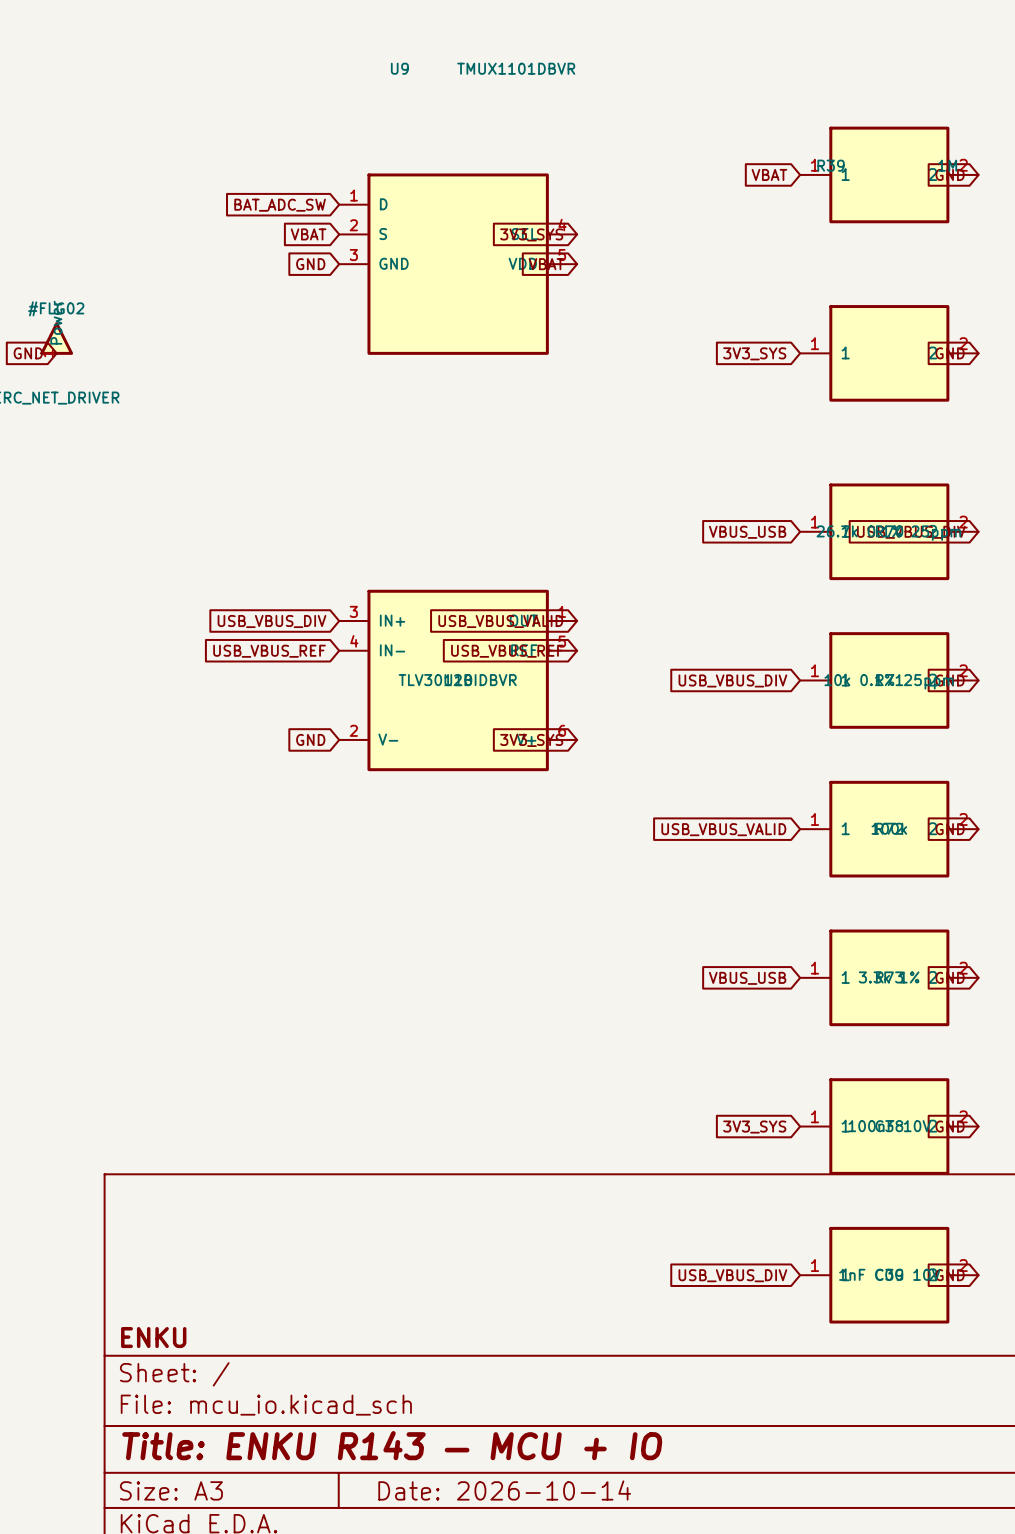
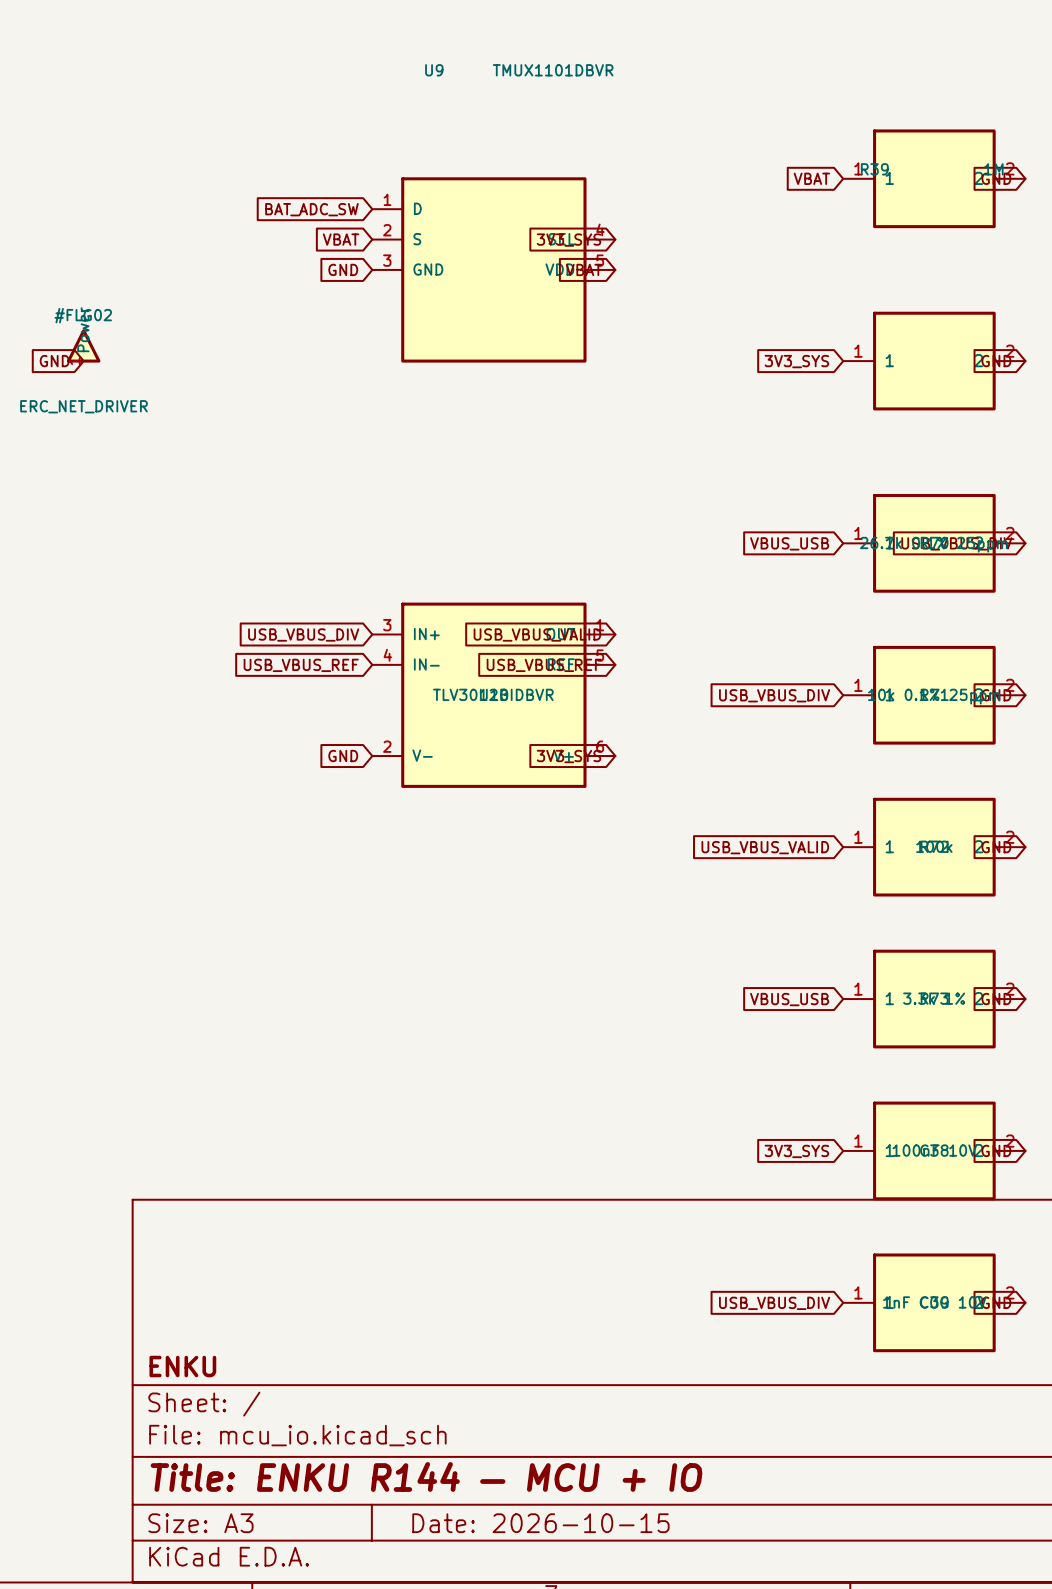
title block: Title: ENKU R143 — MCU + IO (392, 1445) -> Title: ENKU R144 — MCU + IO (426, 1476)
title block: Date: 2026-10-14 (504, 1490) -> Date: 2026-10-15 (540, 1523)

